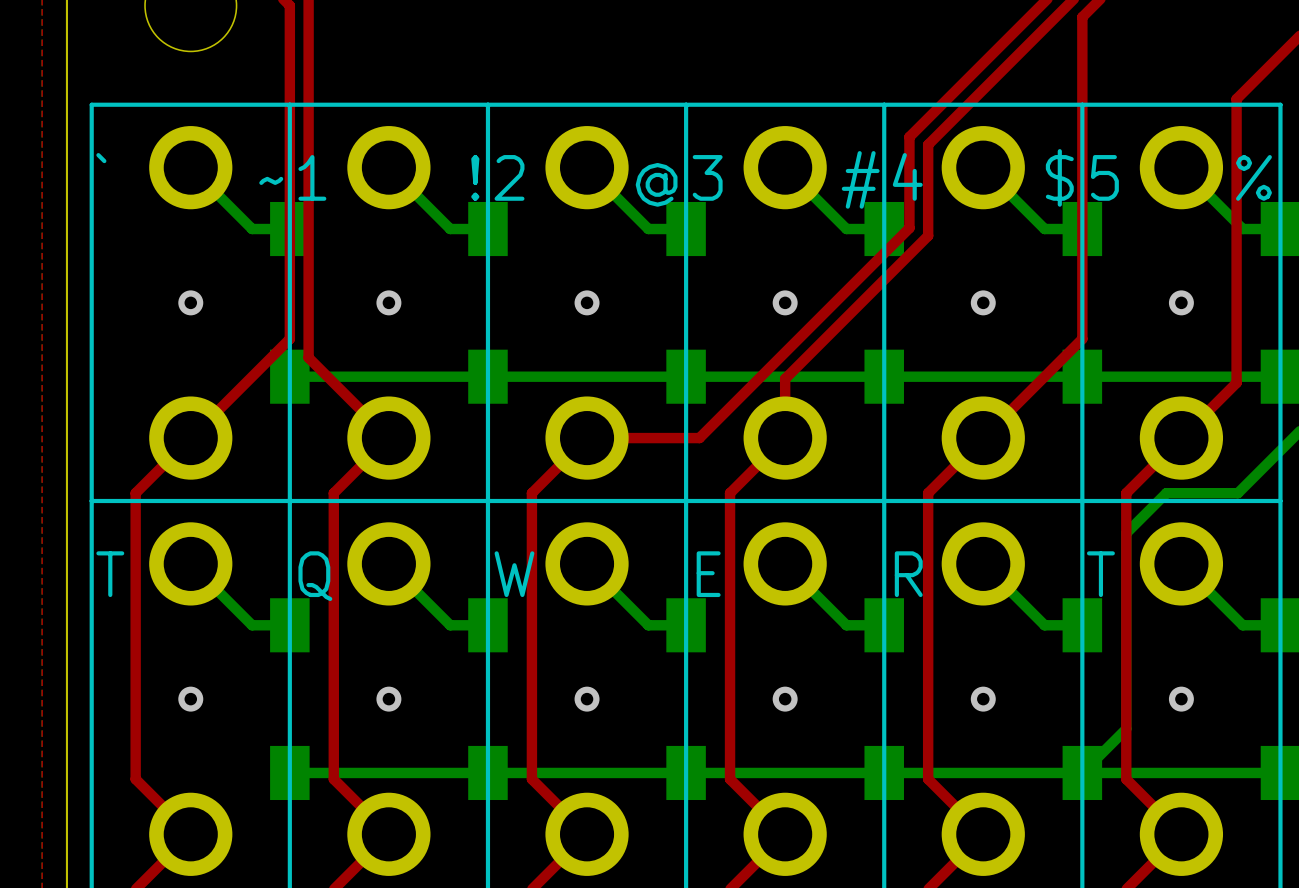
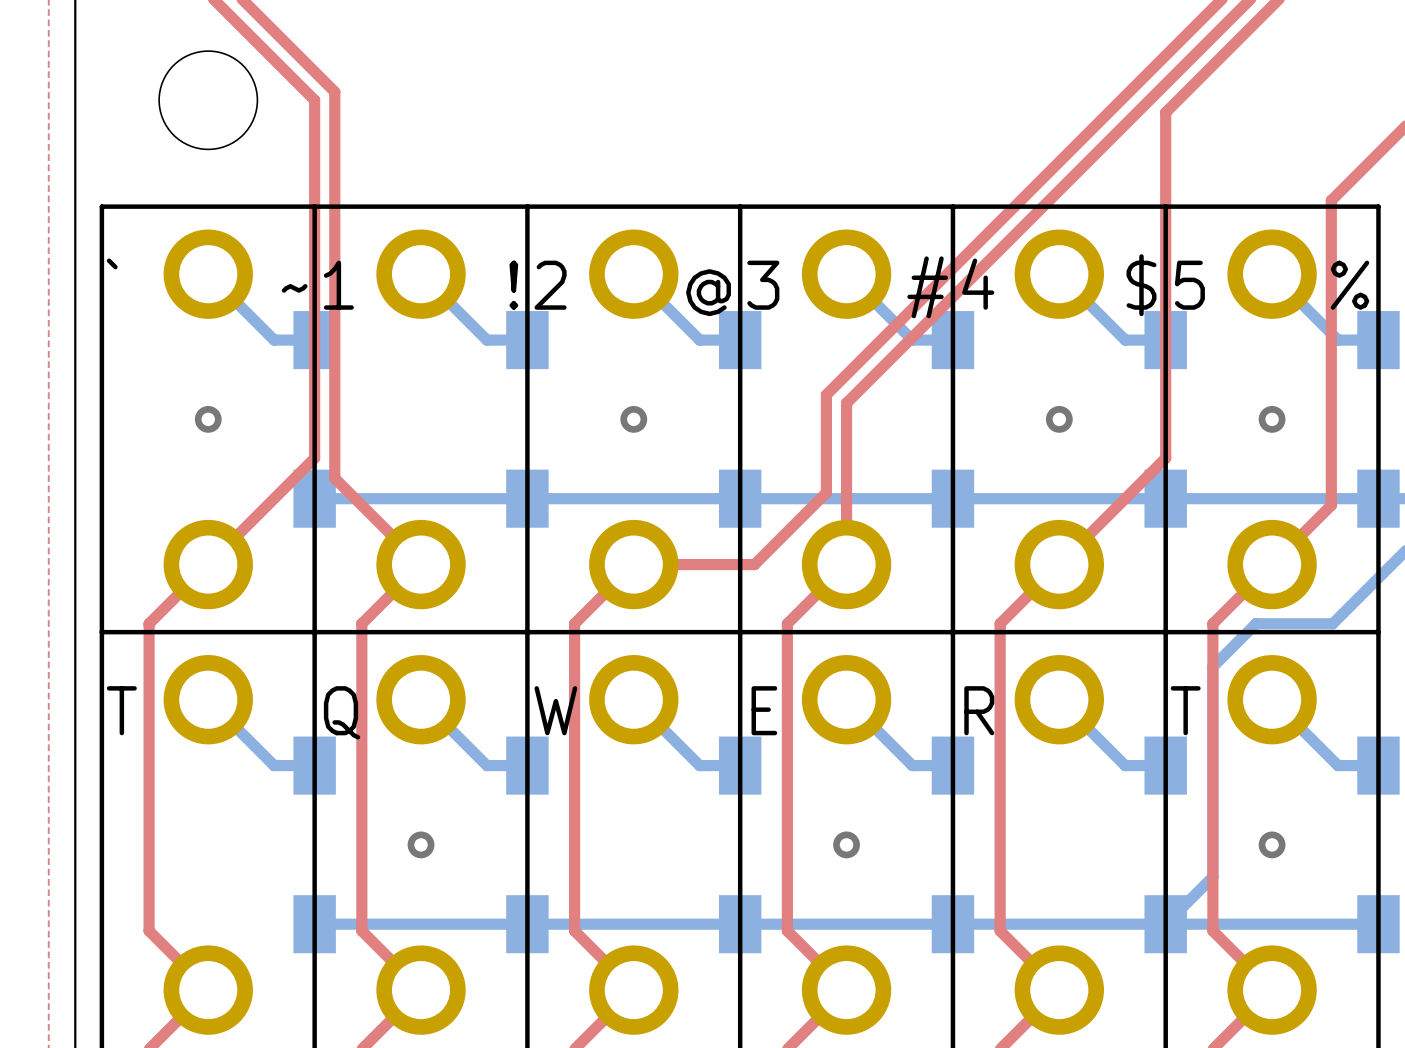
top track: (909, 137) (909, 228) (766, 371) -> (980, 241) (826, 394) (826, 492)
top track: (928, 144) (928, 235) (785, 378) -> (1000, 249) (846, 403) (846, 501)
via: (388, 302) -> none
via: (785, 302) -> none
via: (190, 699) -> none
via: (587, 699) -> none
via: (983, 699) -> none

